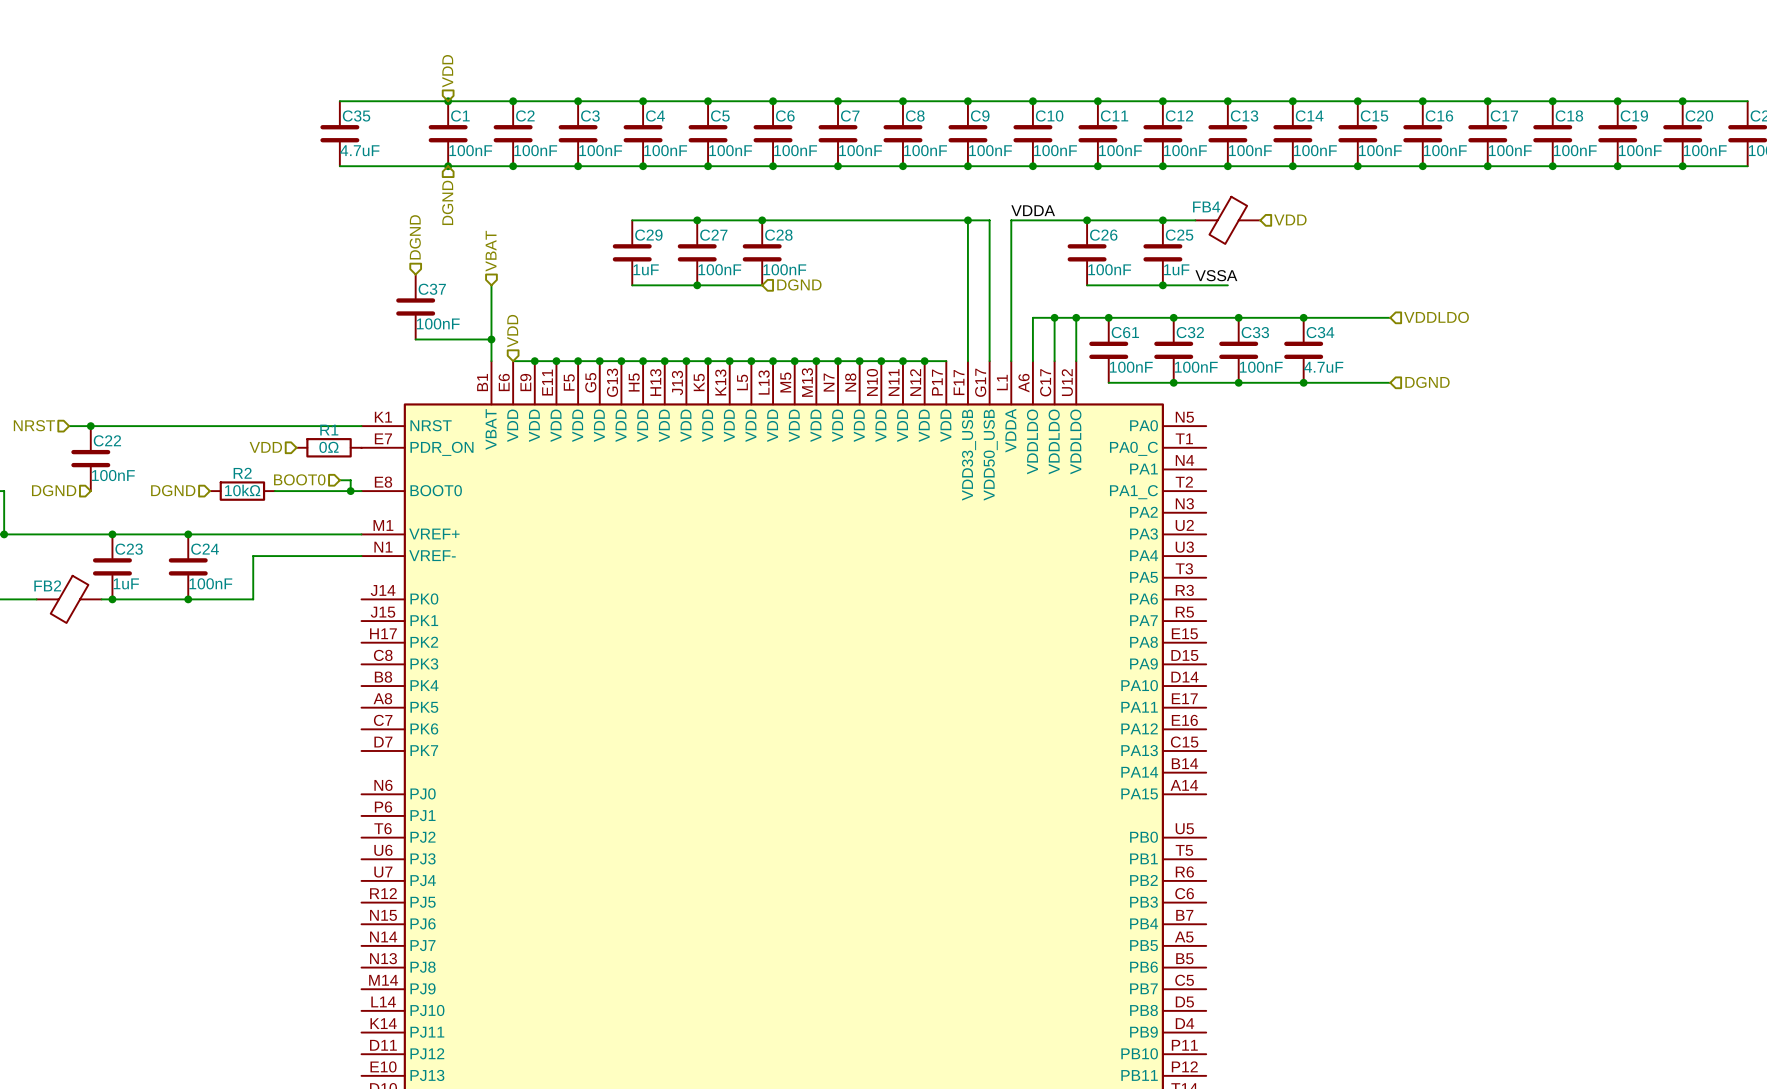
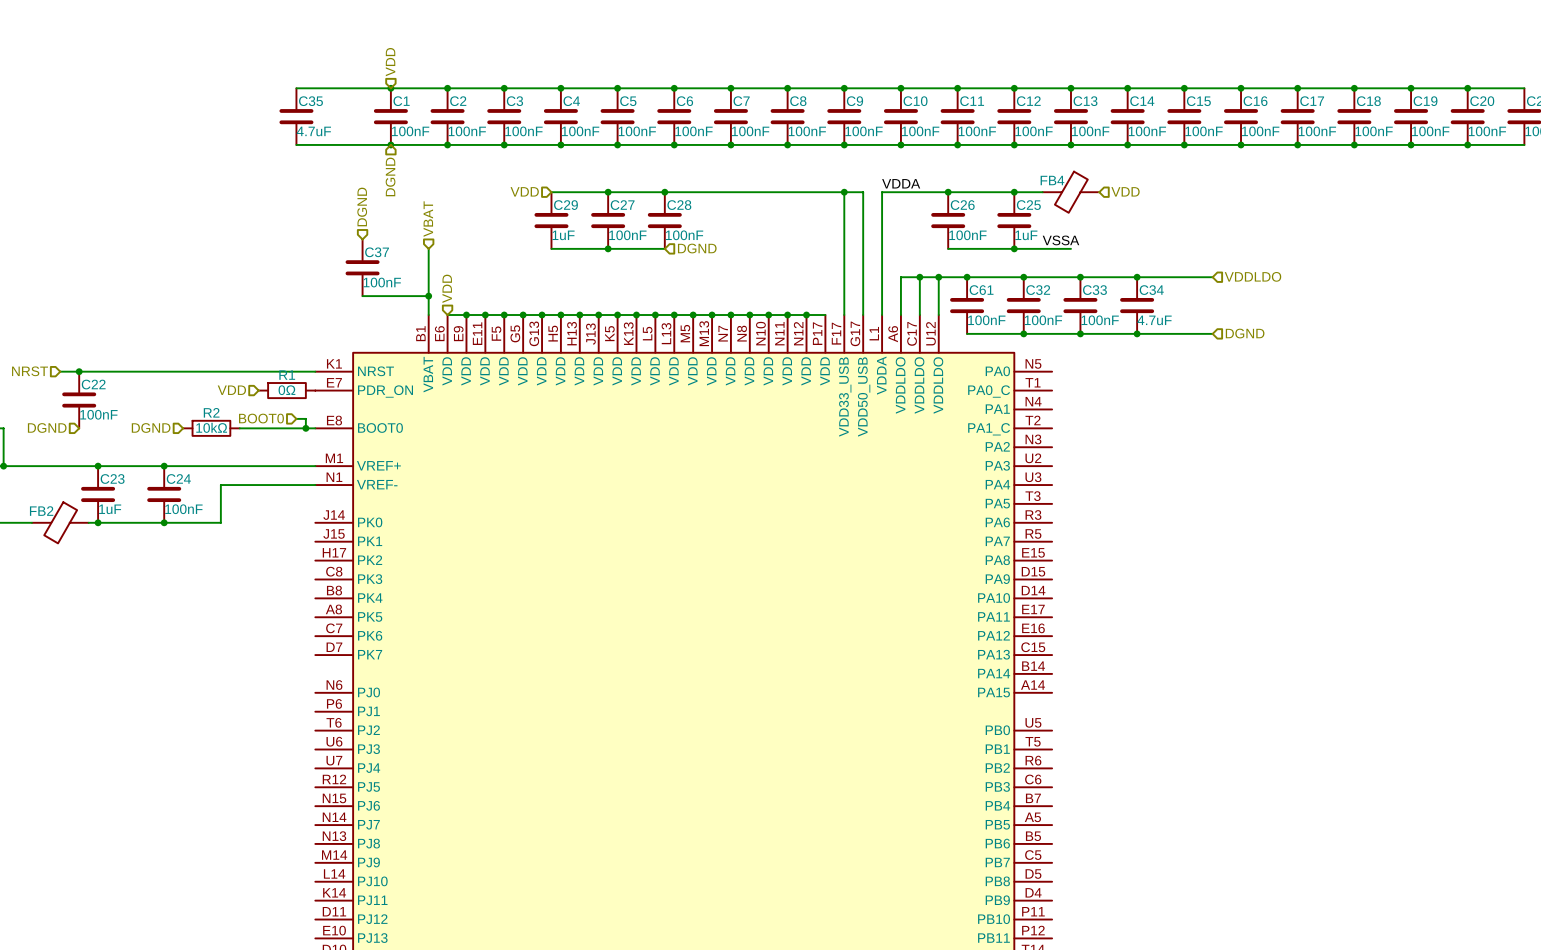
hierarchical label: none -> VDD (524, 191)

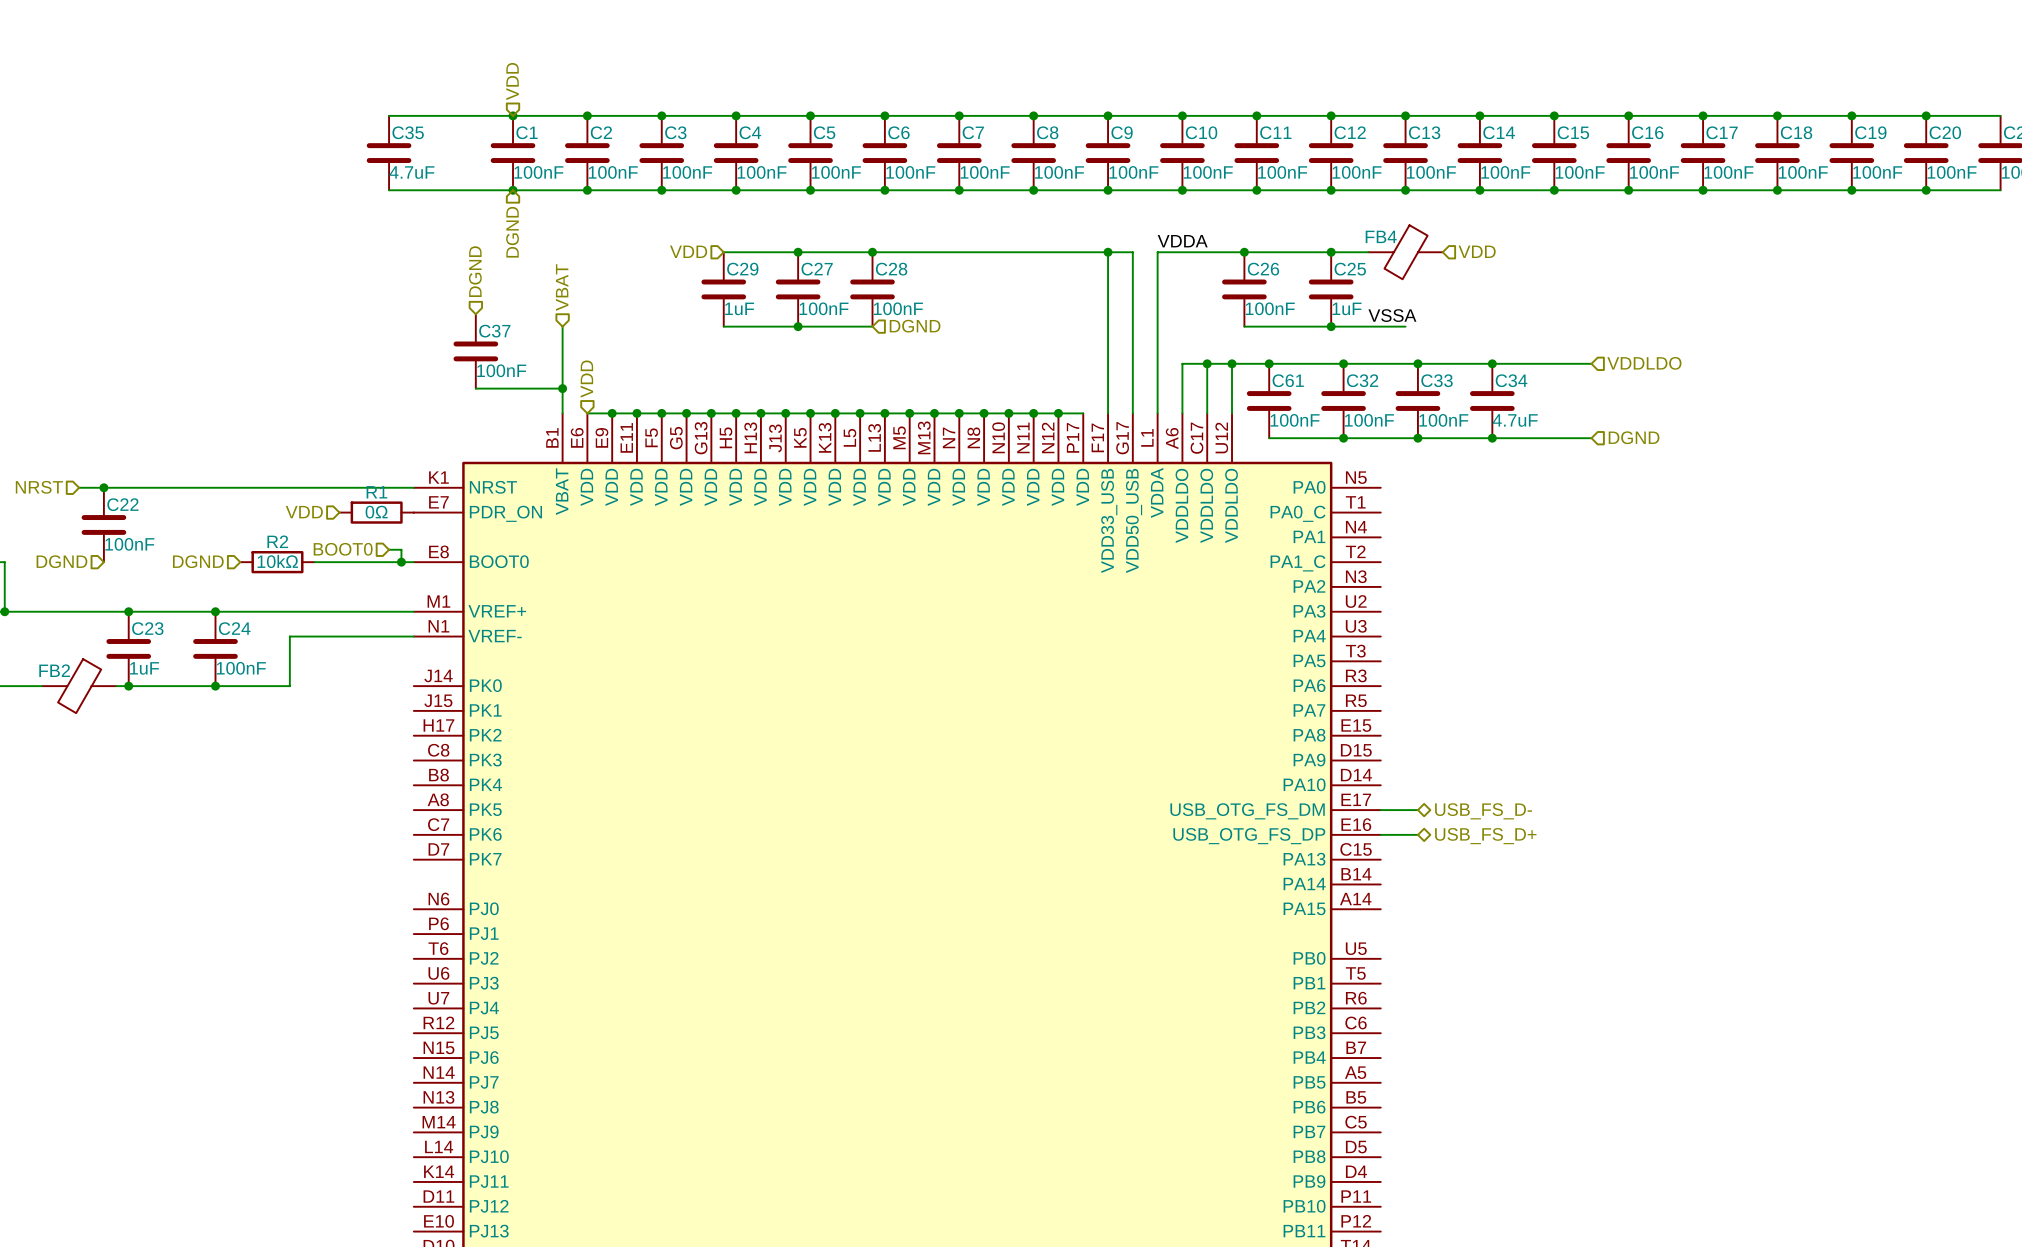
part pin name: PA11 (993, 616) -> USB_OTG_FS_DM (1247, 811)
wire: none -> (1380, 810) (1417, 810)
hierarchical label: none -> USB_FS_D- (1483, 811)
part pin name: PA12 (993, 635) -> USB_OTG_FS_DP (1249, 836)
wire: none -> (1380, 834) (1417, 834)
hierarchical label: none -> USB_FS_D+ (1485, 836)

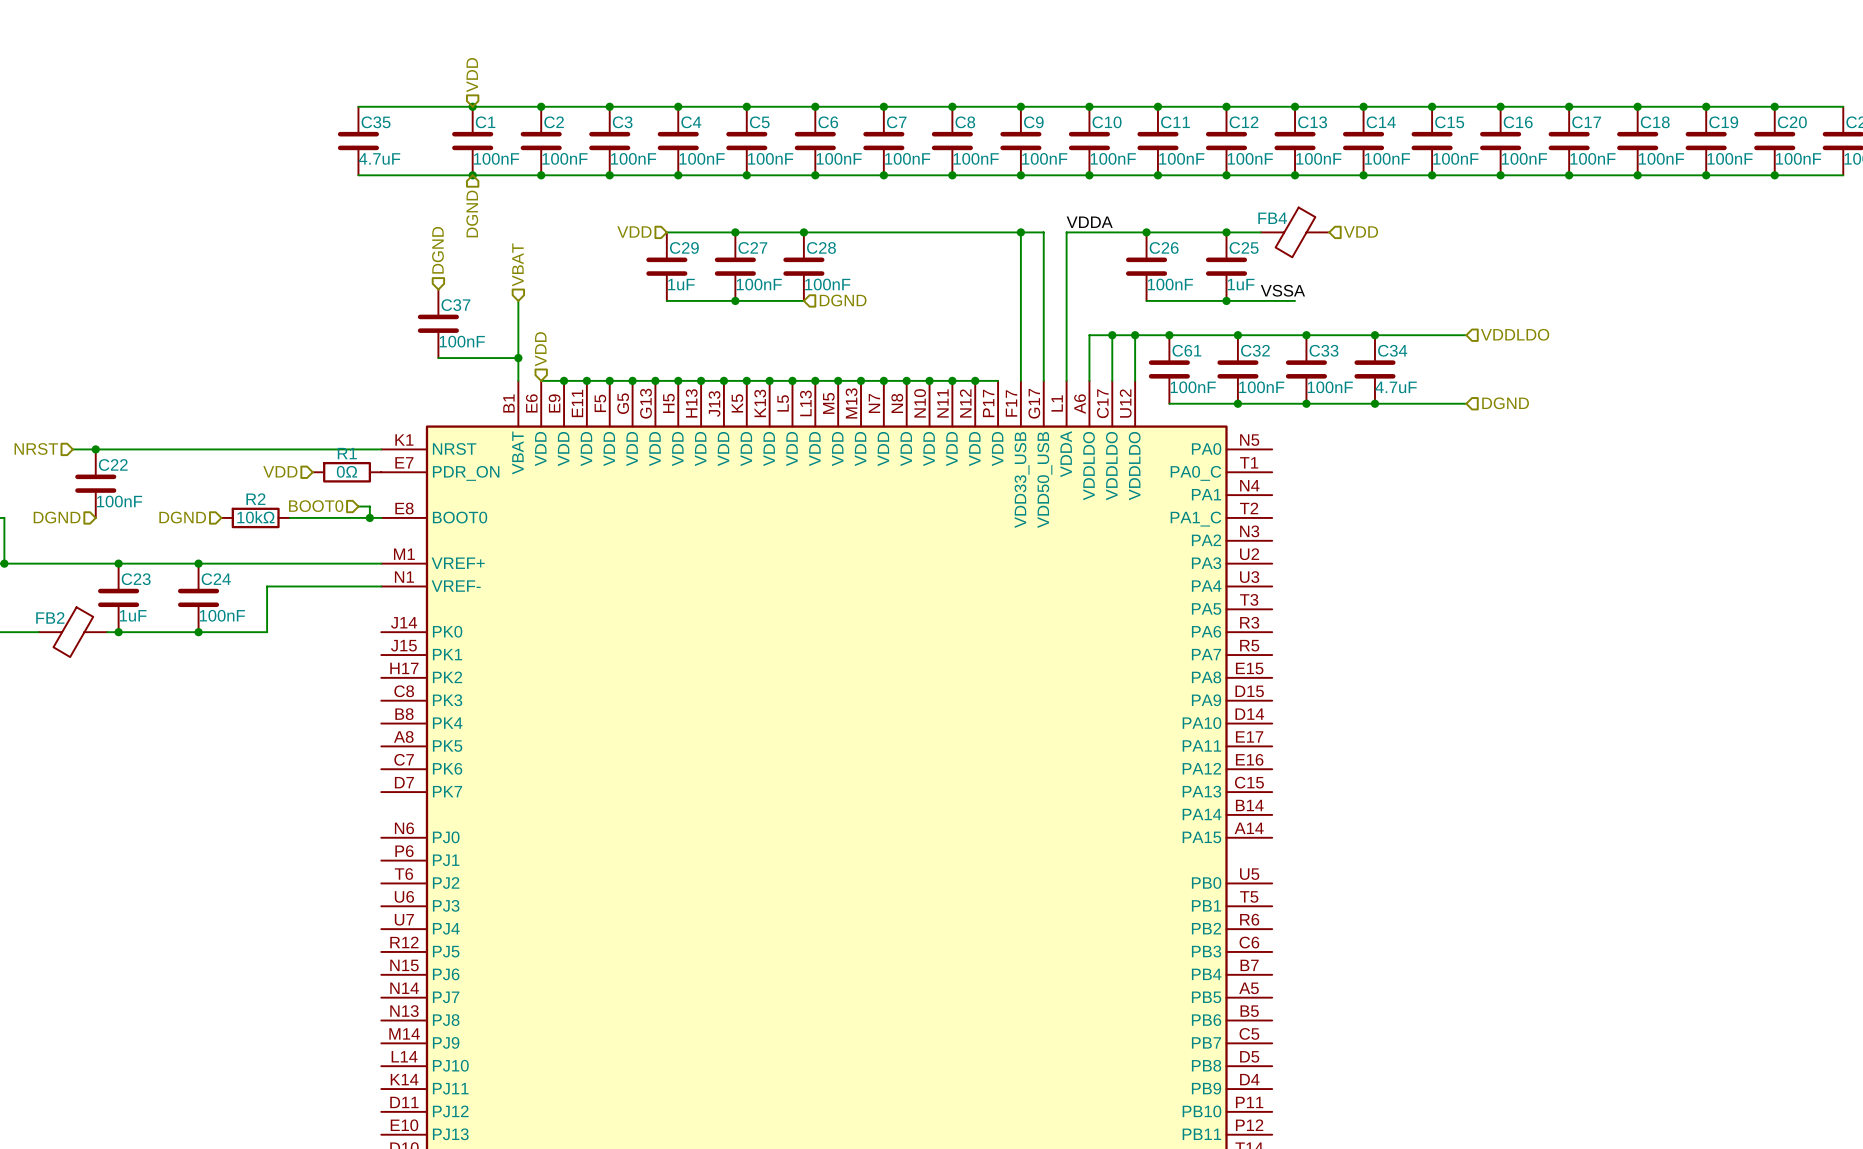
wire: (1380, 810) (1417, 810) -> none
part pin name: USB_OTG_FS_DM (1247, 811) -> PA11 (1201, 745)
hierarchical label: USB_FS_D- (1483, 811) -> none
wire: (1380, 834) (1417, 834) -> none
part pin name: USB_OTG_FS_DP (1249, 836) -> PA12 (1201, 768)
hierarchical label: USB_FS_D+ (1485, 836) -> none

